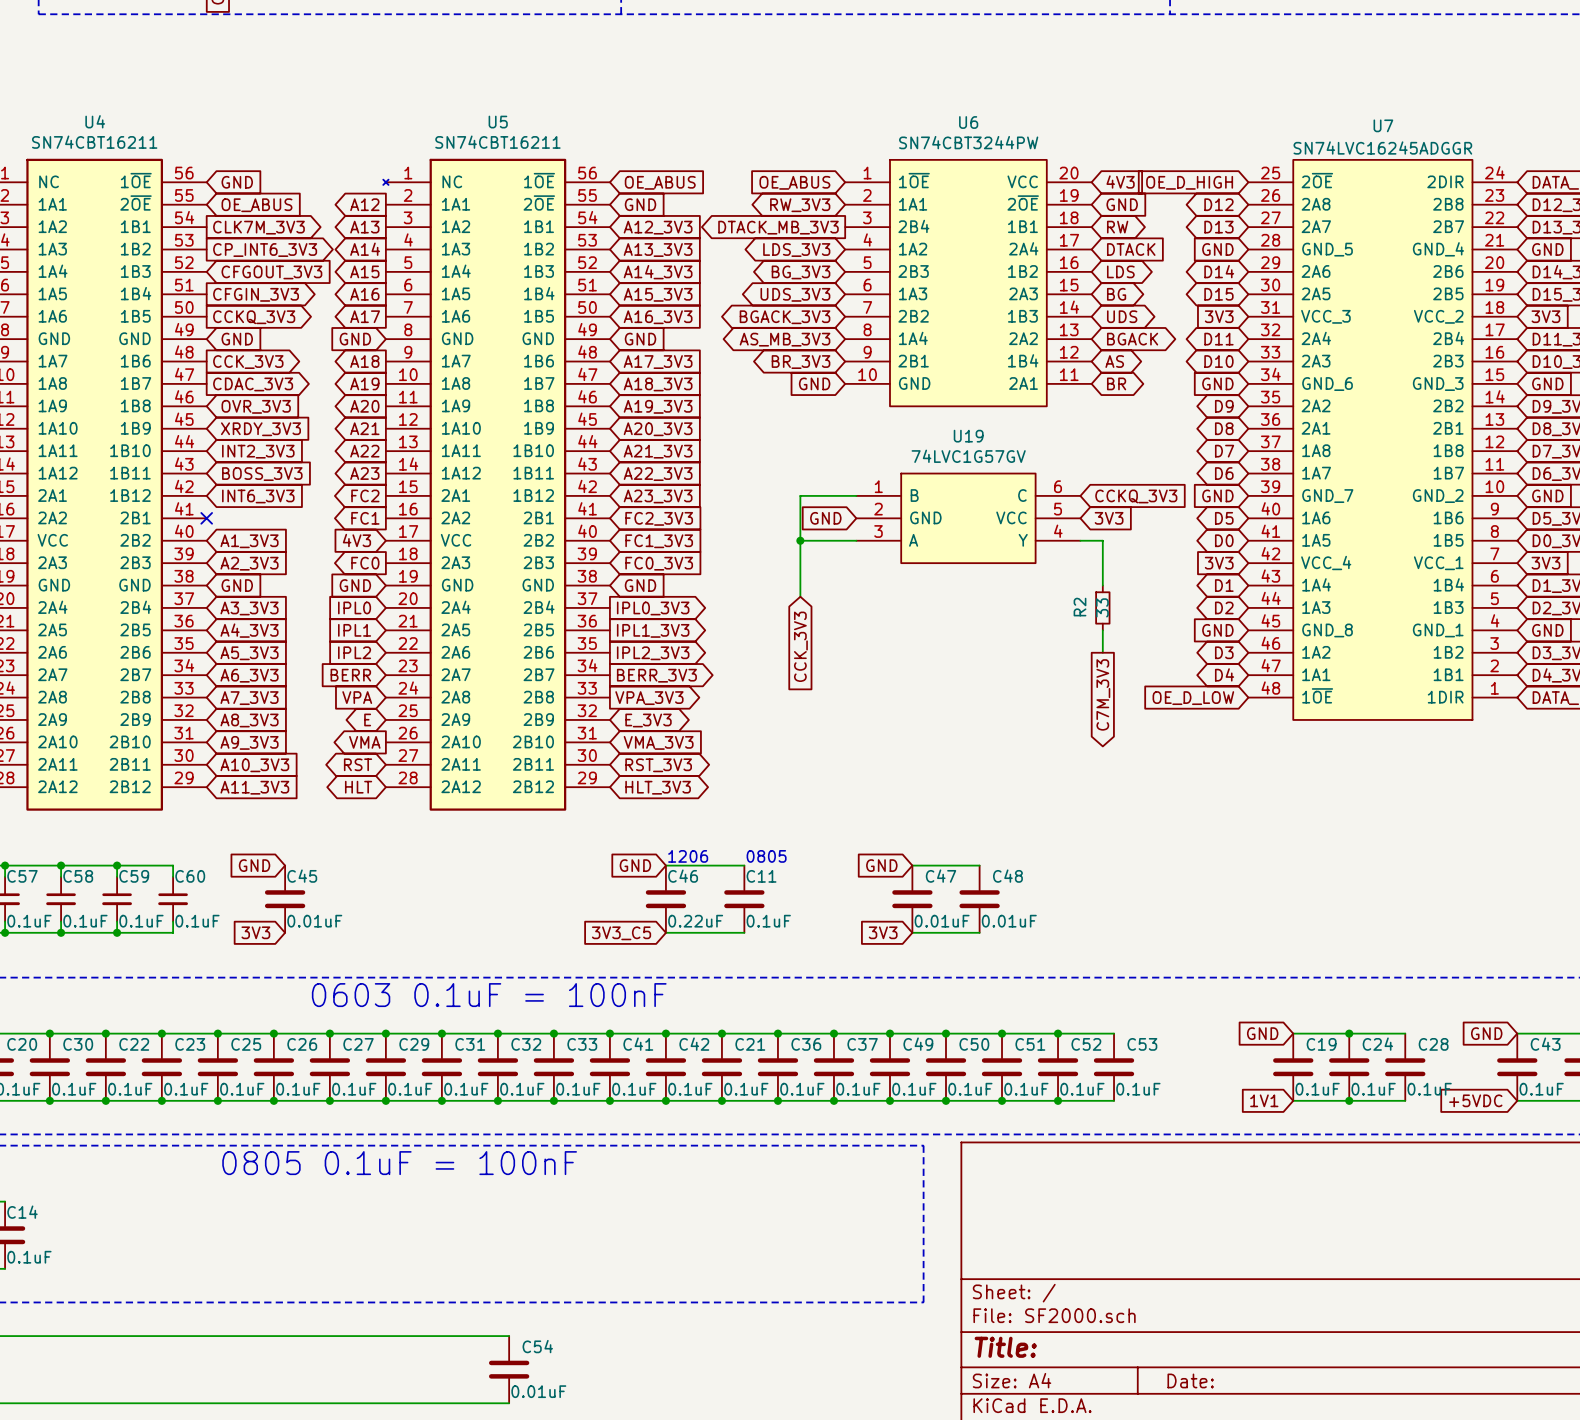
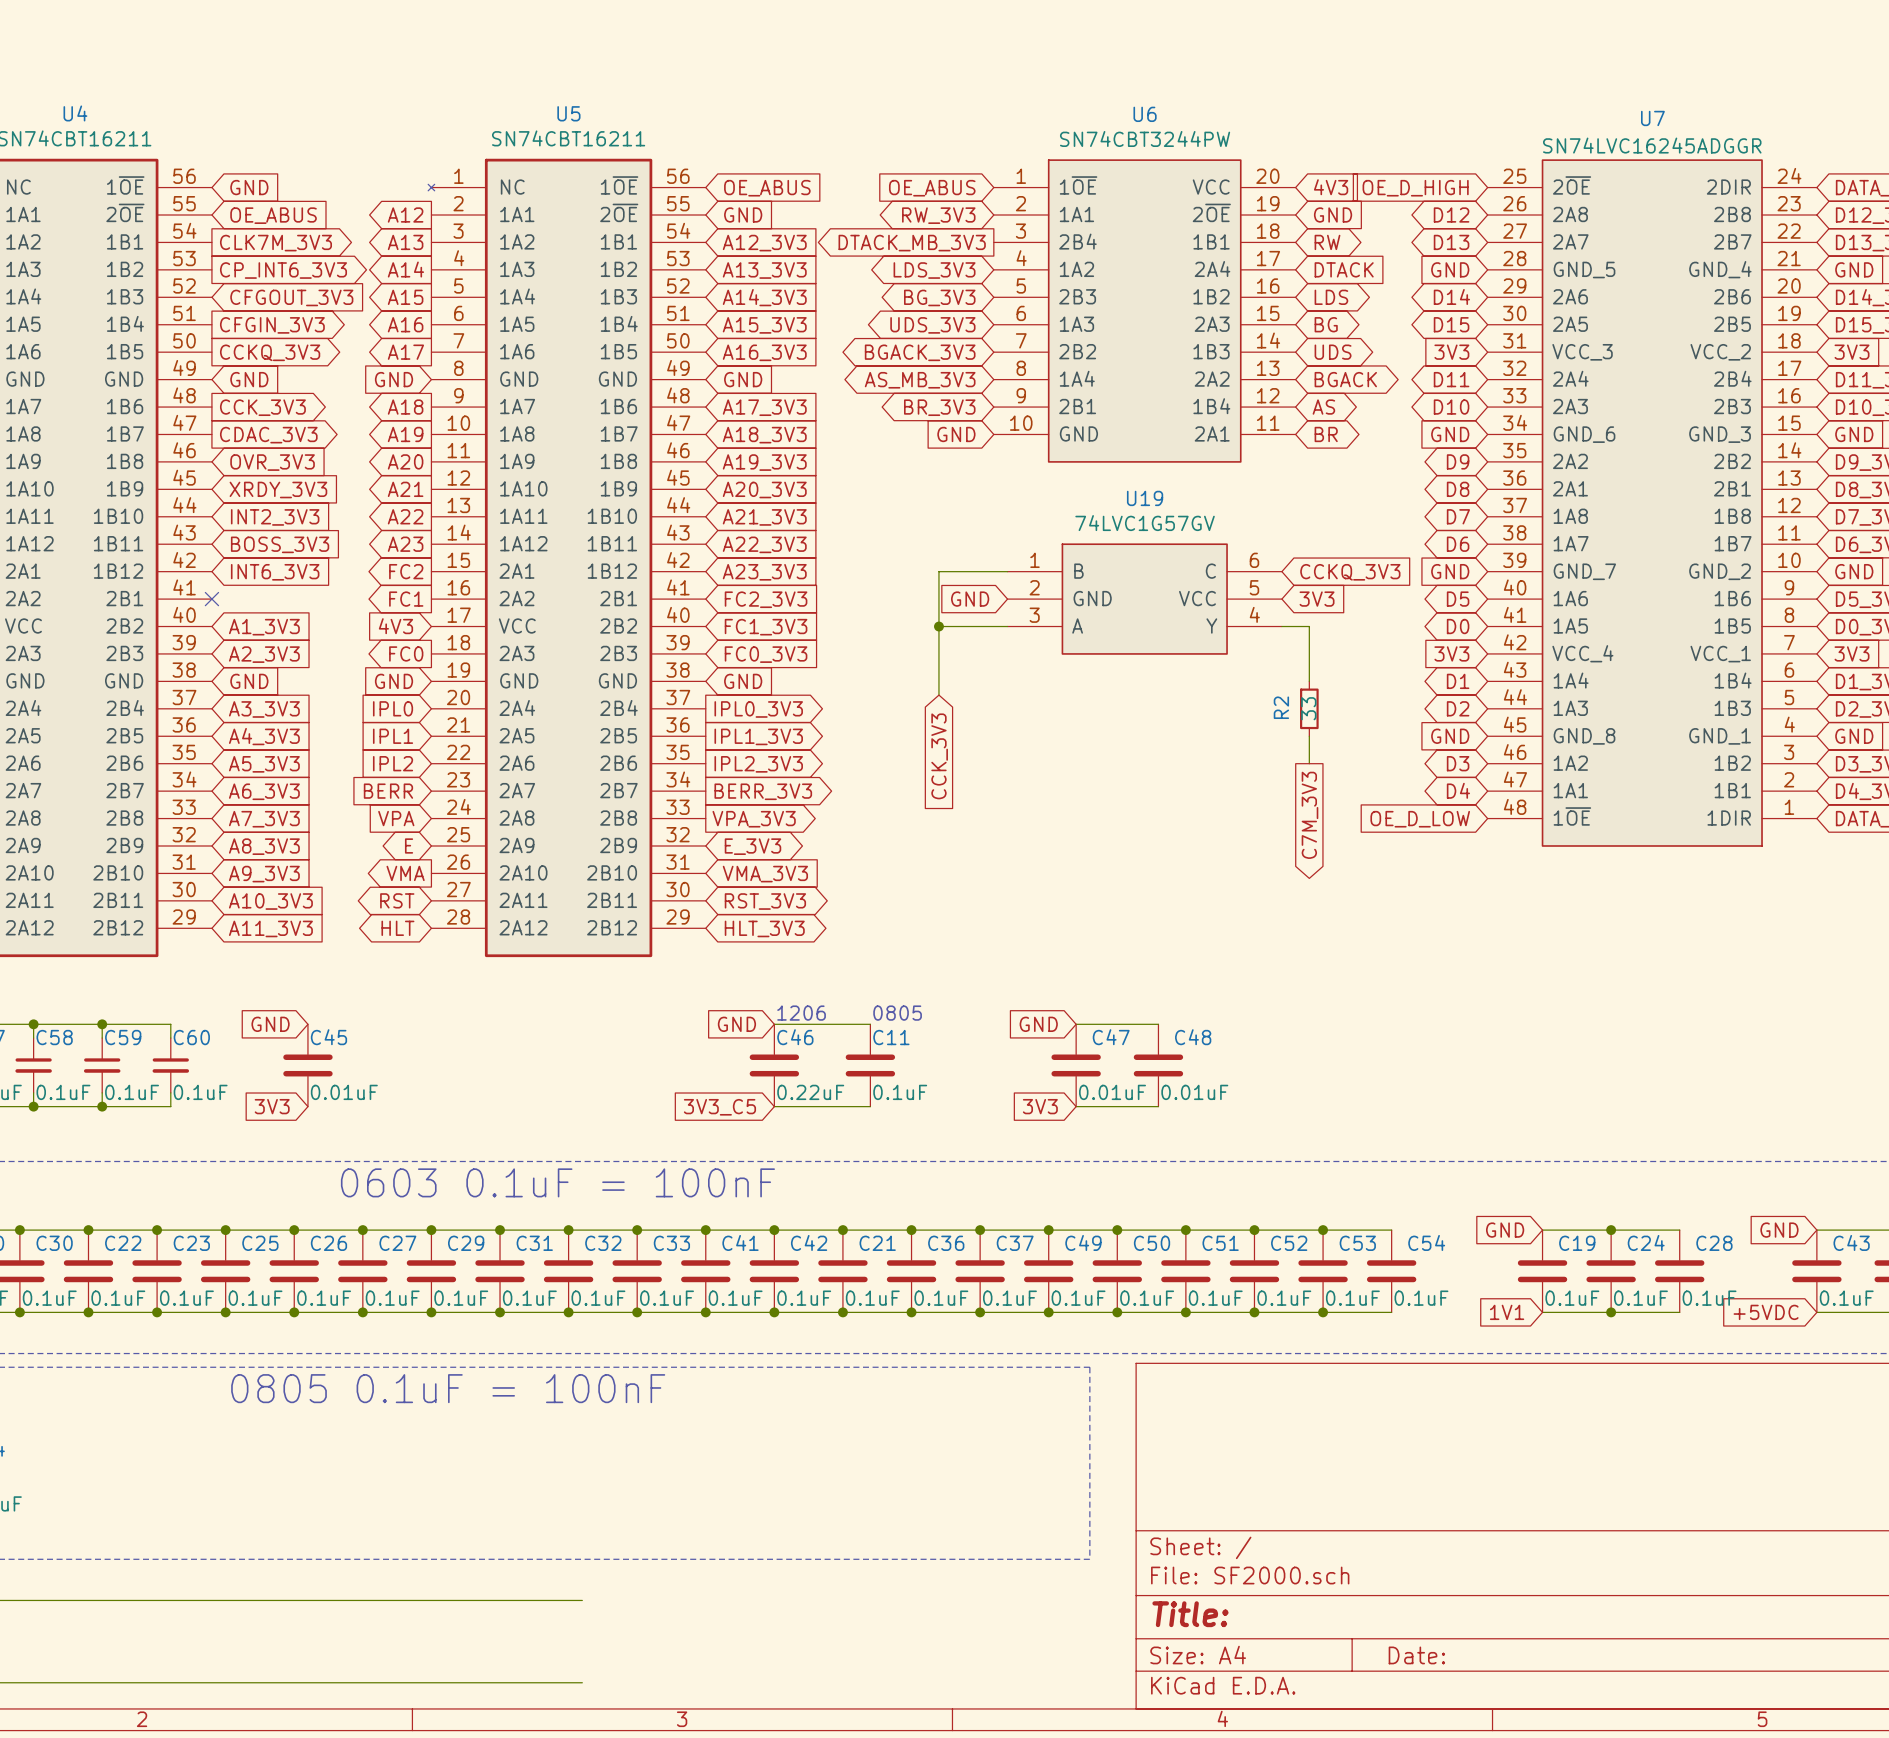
wire: none -> (1323, 1230) (1391, 1230)
junction: none -> (1323, 1230)
wire: none -> (1323, 1312) (1391, 1312)
junction: none -> (1323, 1312)
C54 position: (509, 1369) -> (1391, 1271)
C54 value: 0.01uF (538, 1391) -> 0.1uF (1421, 1298)

